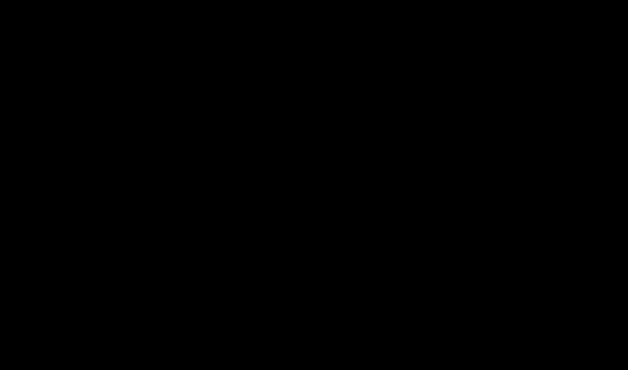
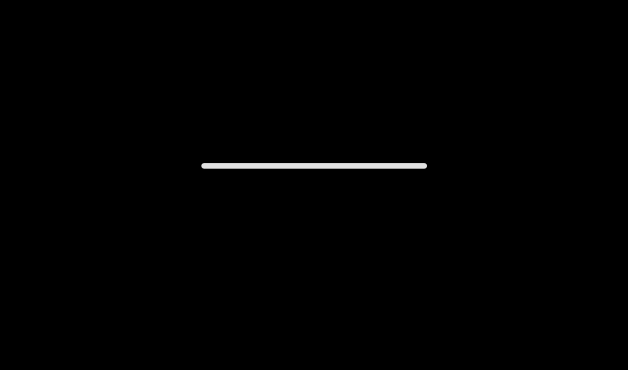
line: none -> (424, 165) (204, 165)

